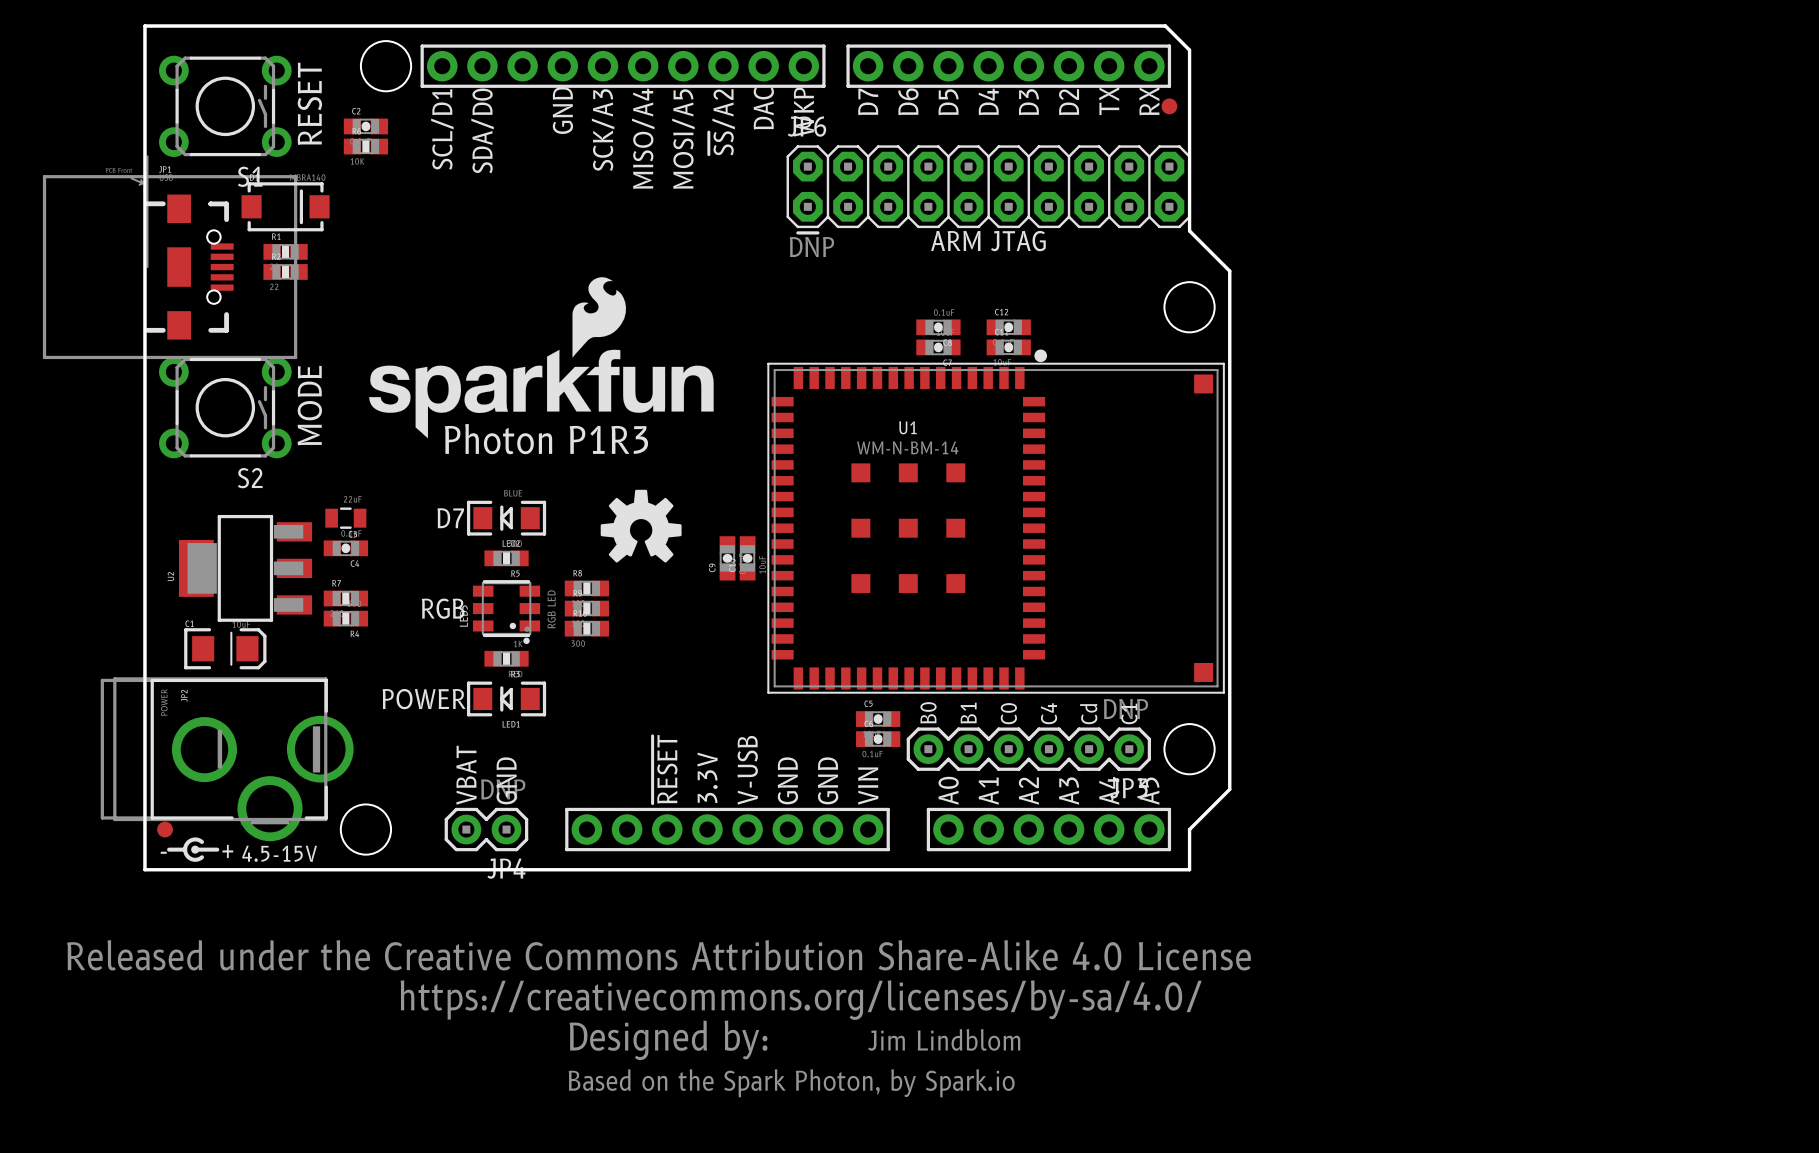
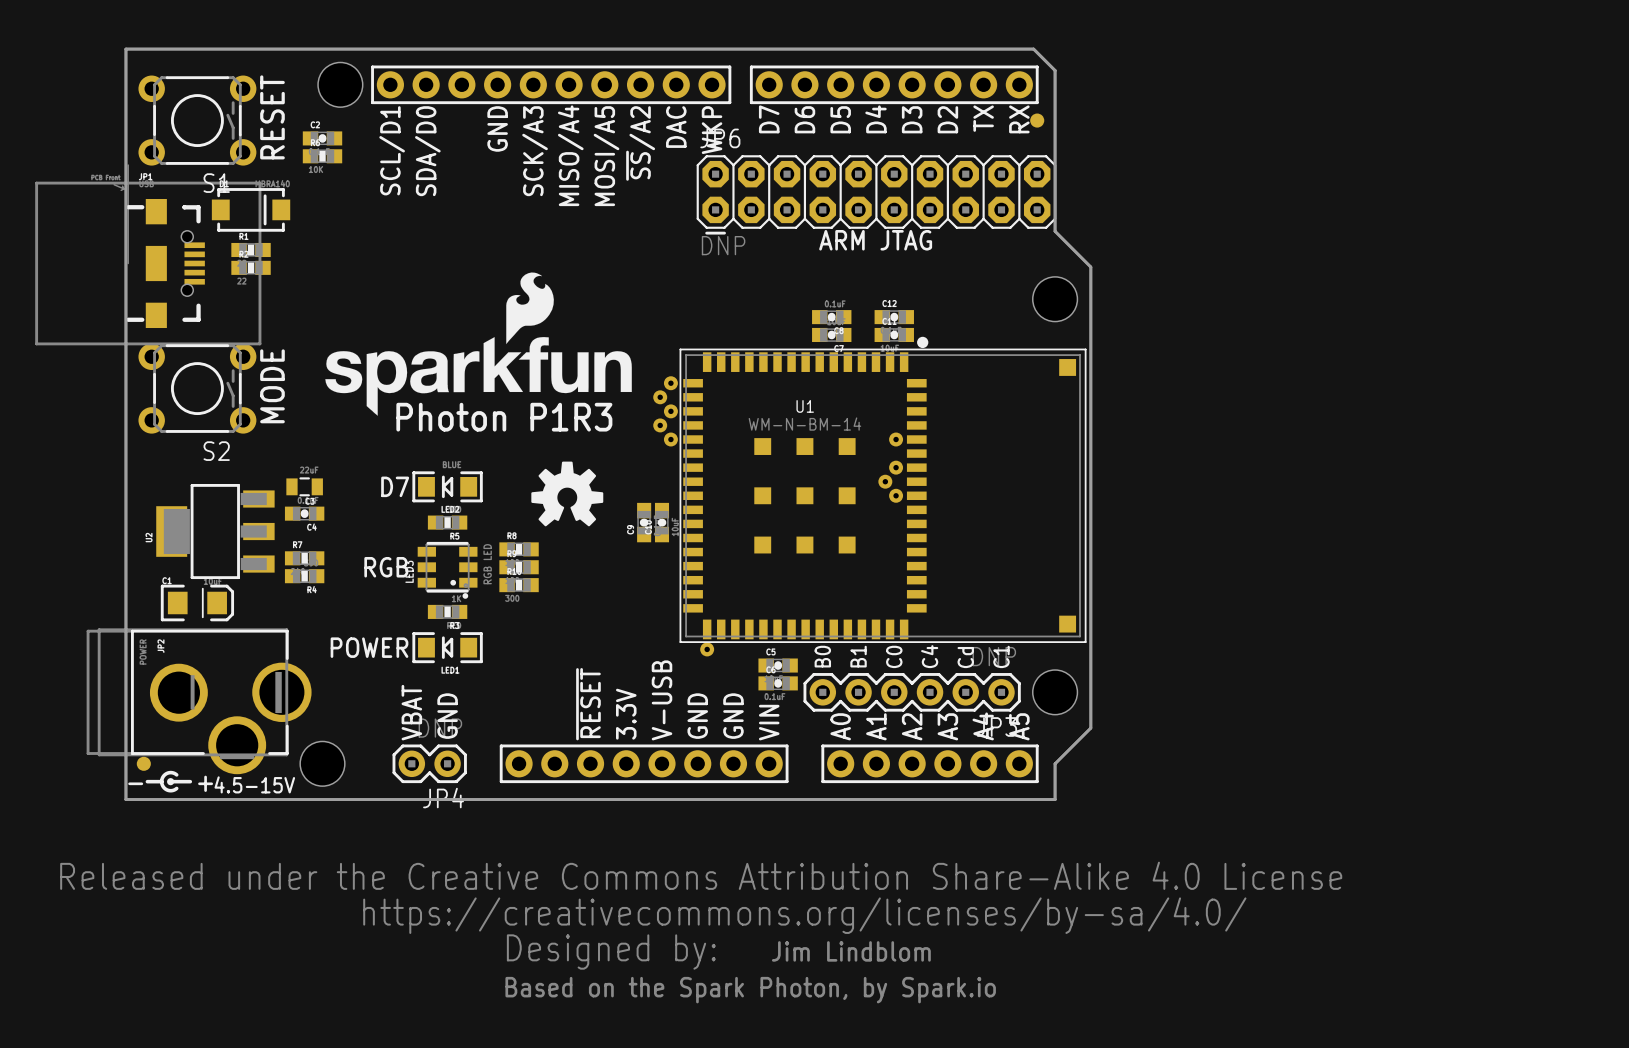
part: none -> (670, 383)
part: none -> (660, 397)
part: none -> (670, 411)
part: none -> (660, 425)
part: none -> (670, 439)
part: none -> (896, 439)
part: none -> (896, 467)
part: none -> (885, 481)
part: none -> (896, 495)
part: none -> (707, 649)

